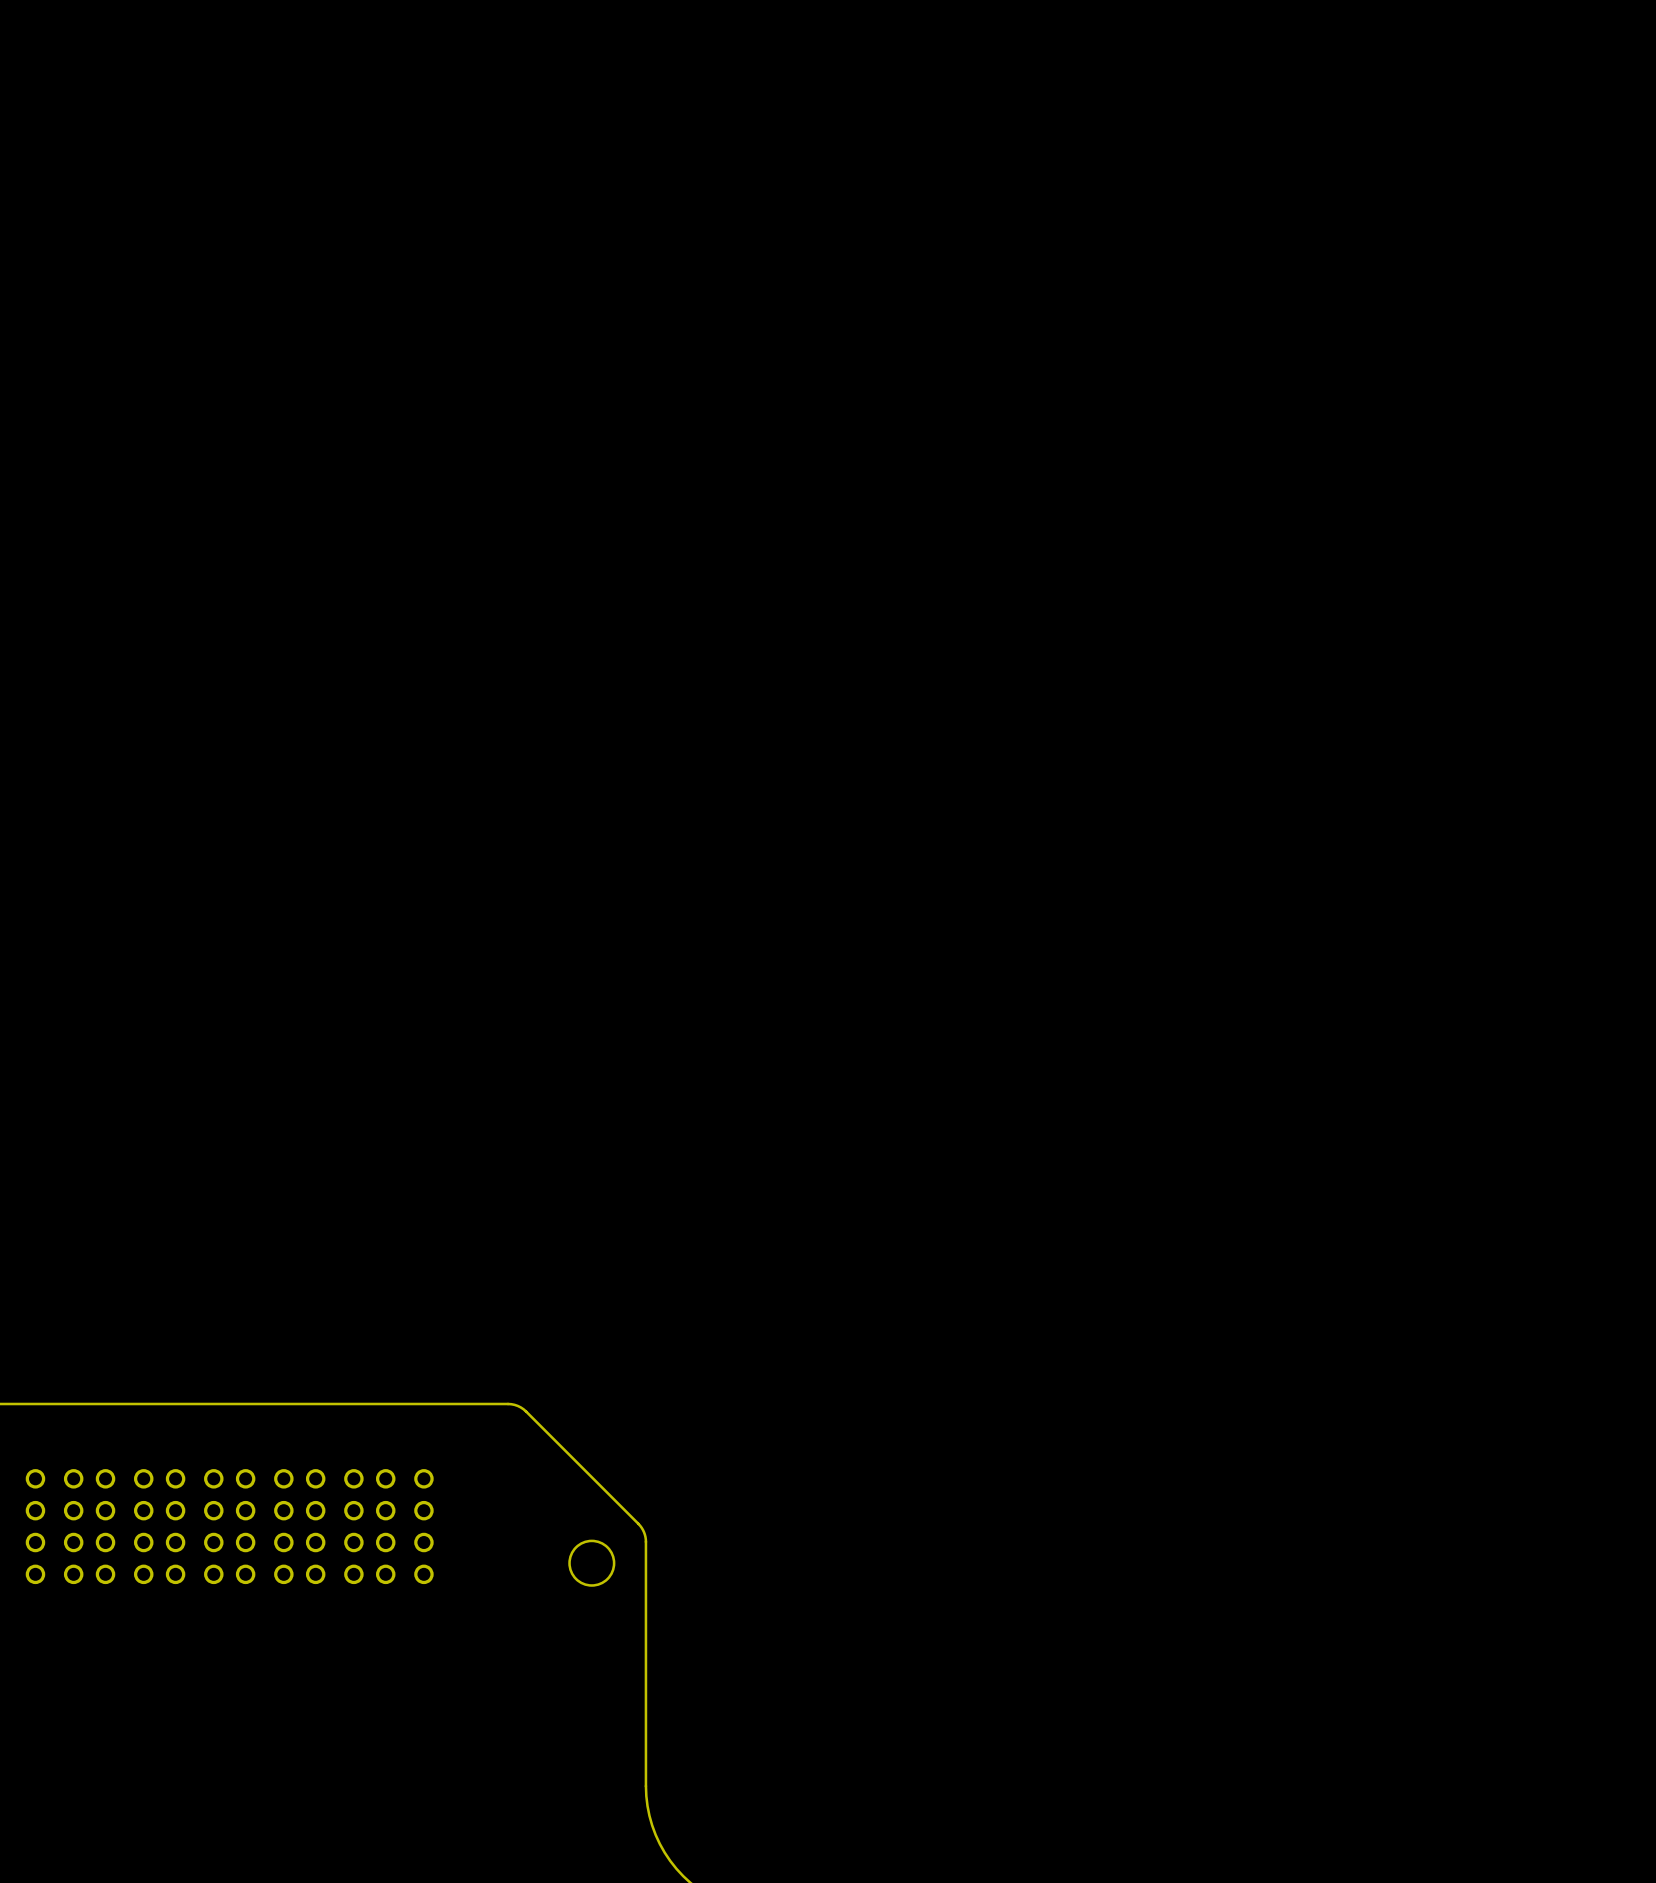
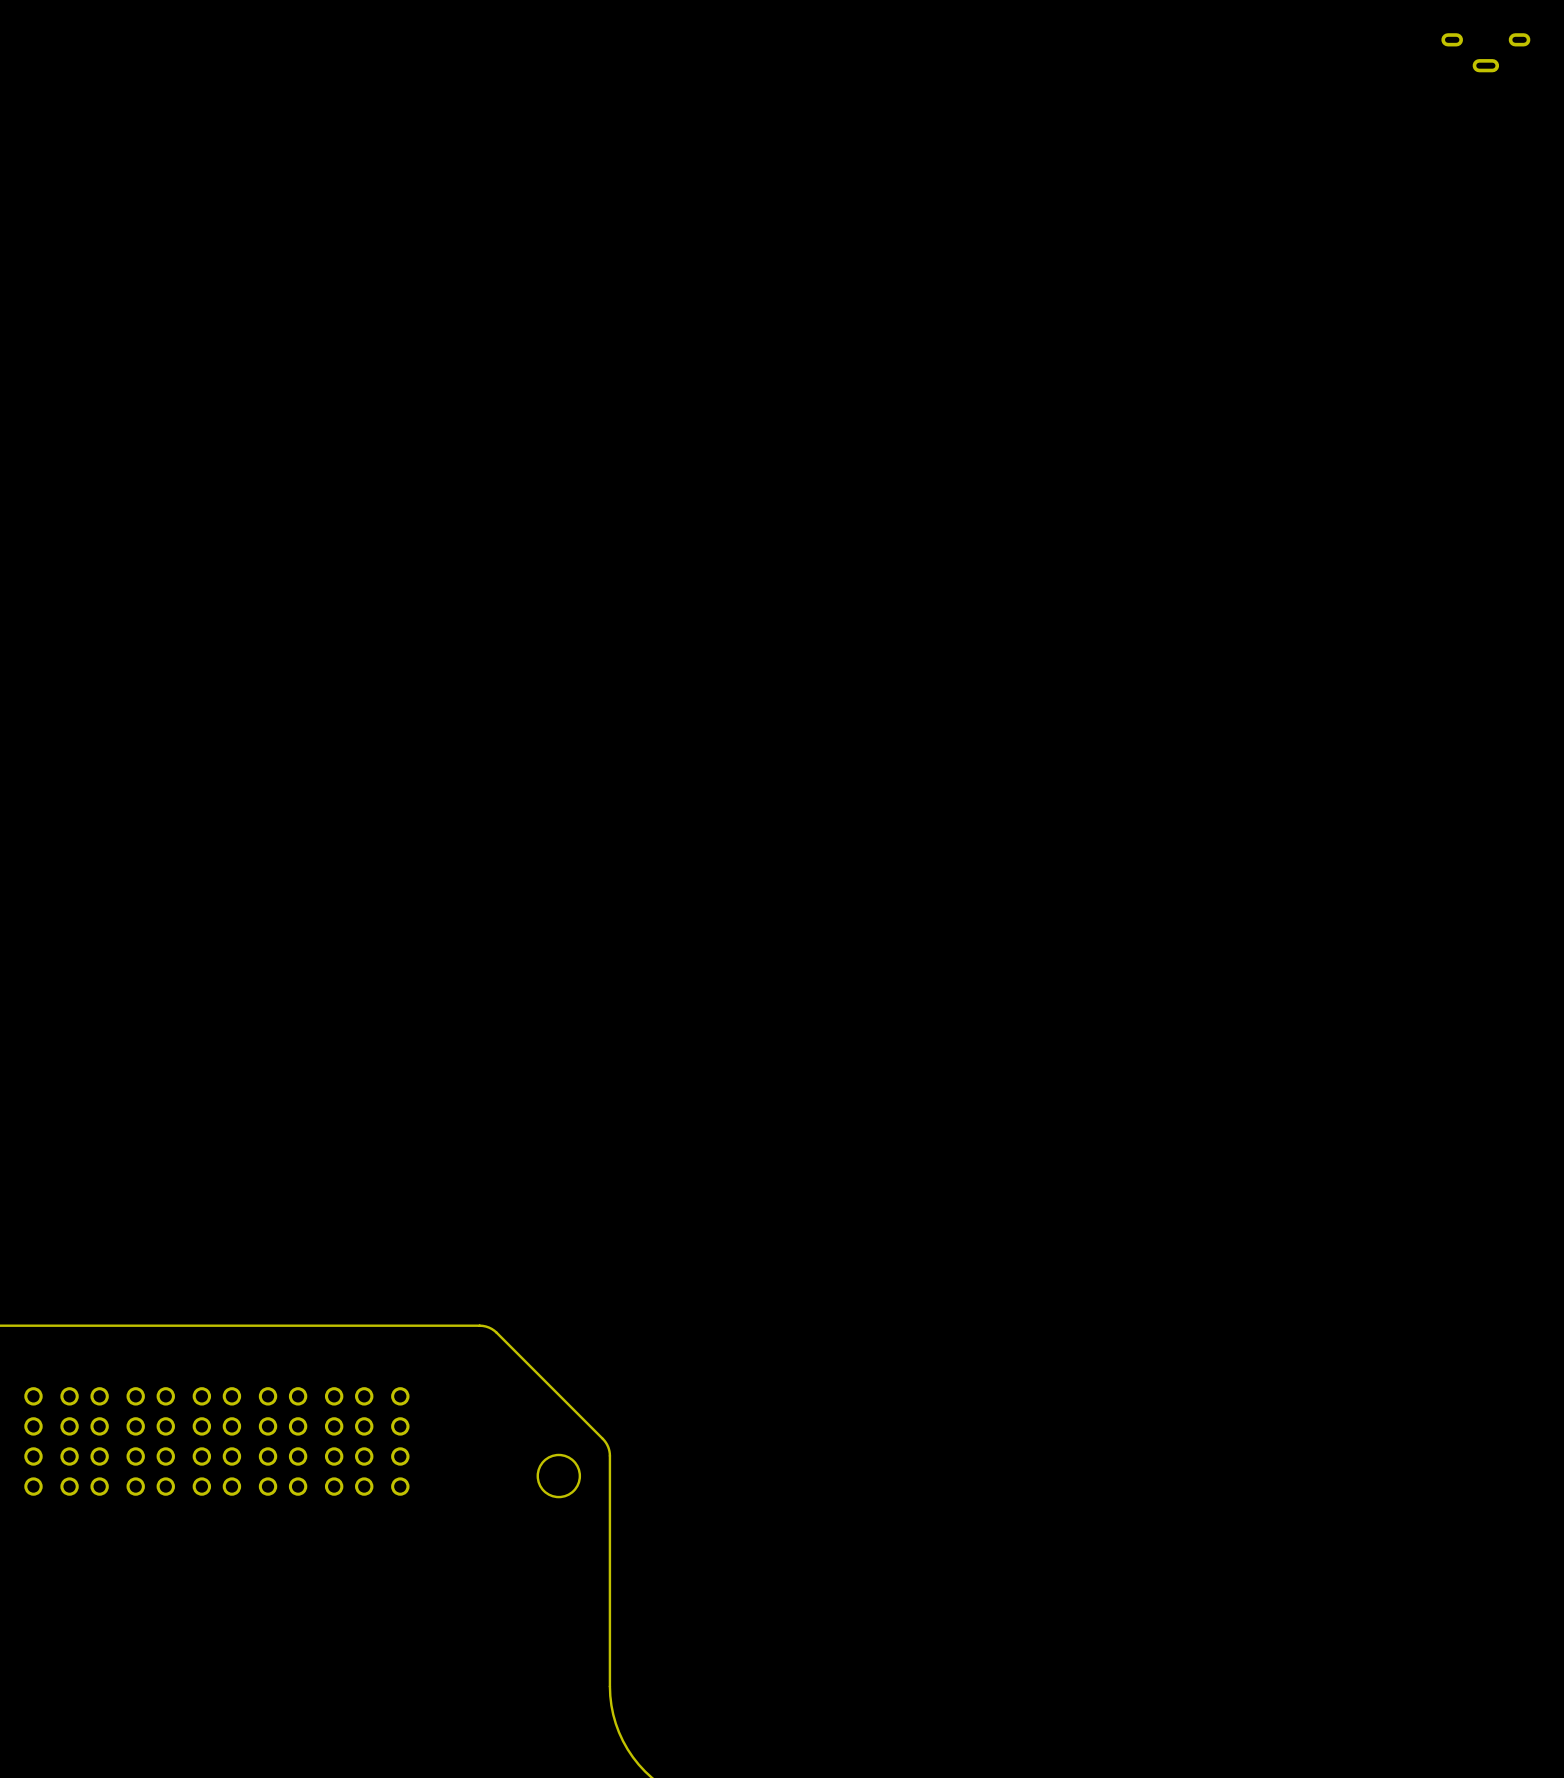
part: none -> (1485, 52)

